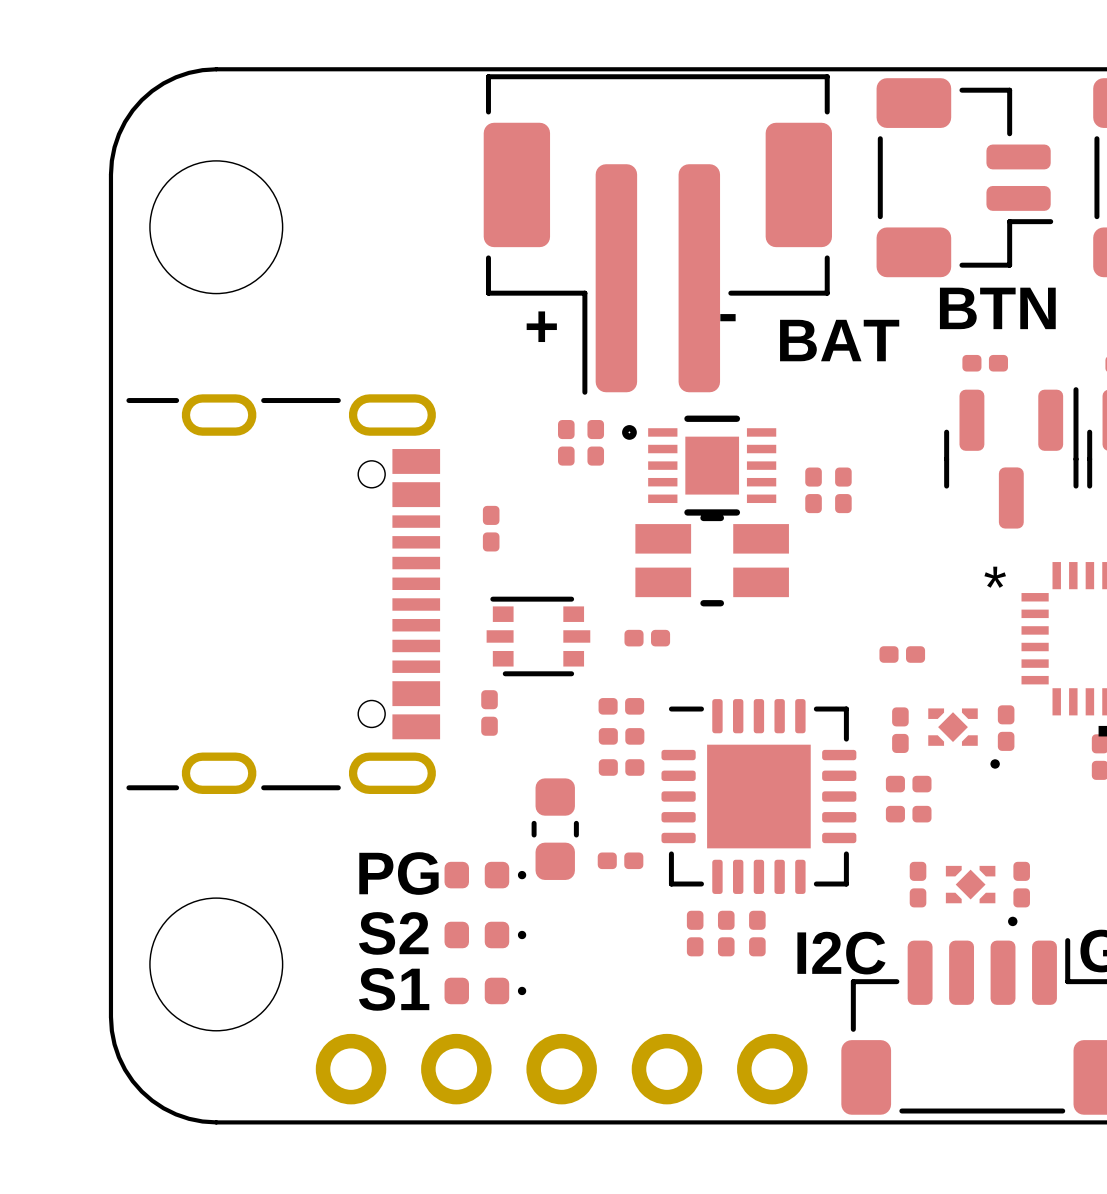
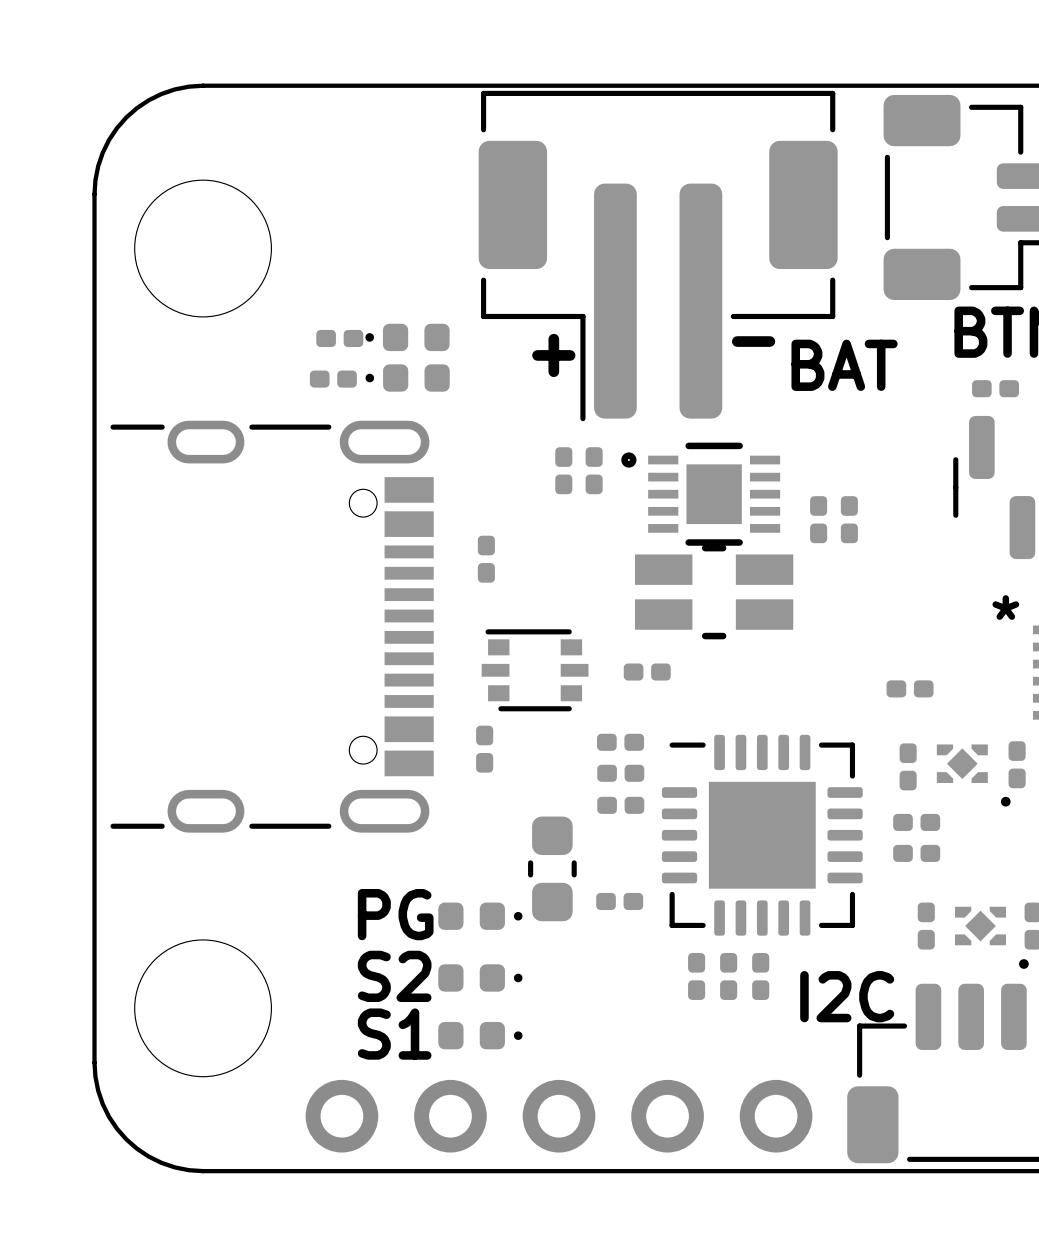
part: none -> (407, 337)
part: none -> (339, 338)
part: none -> (407, 378)
part: none -> (333, 379)

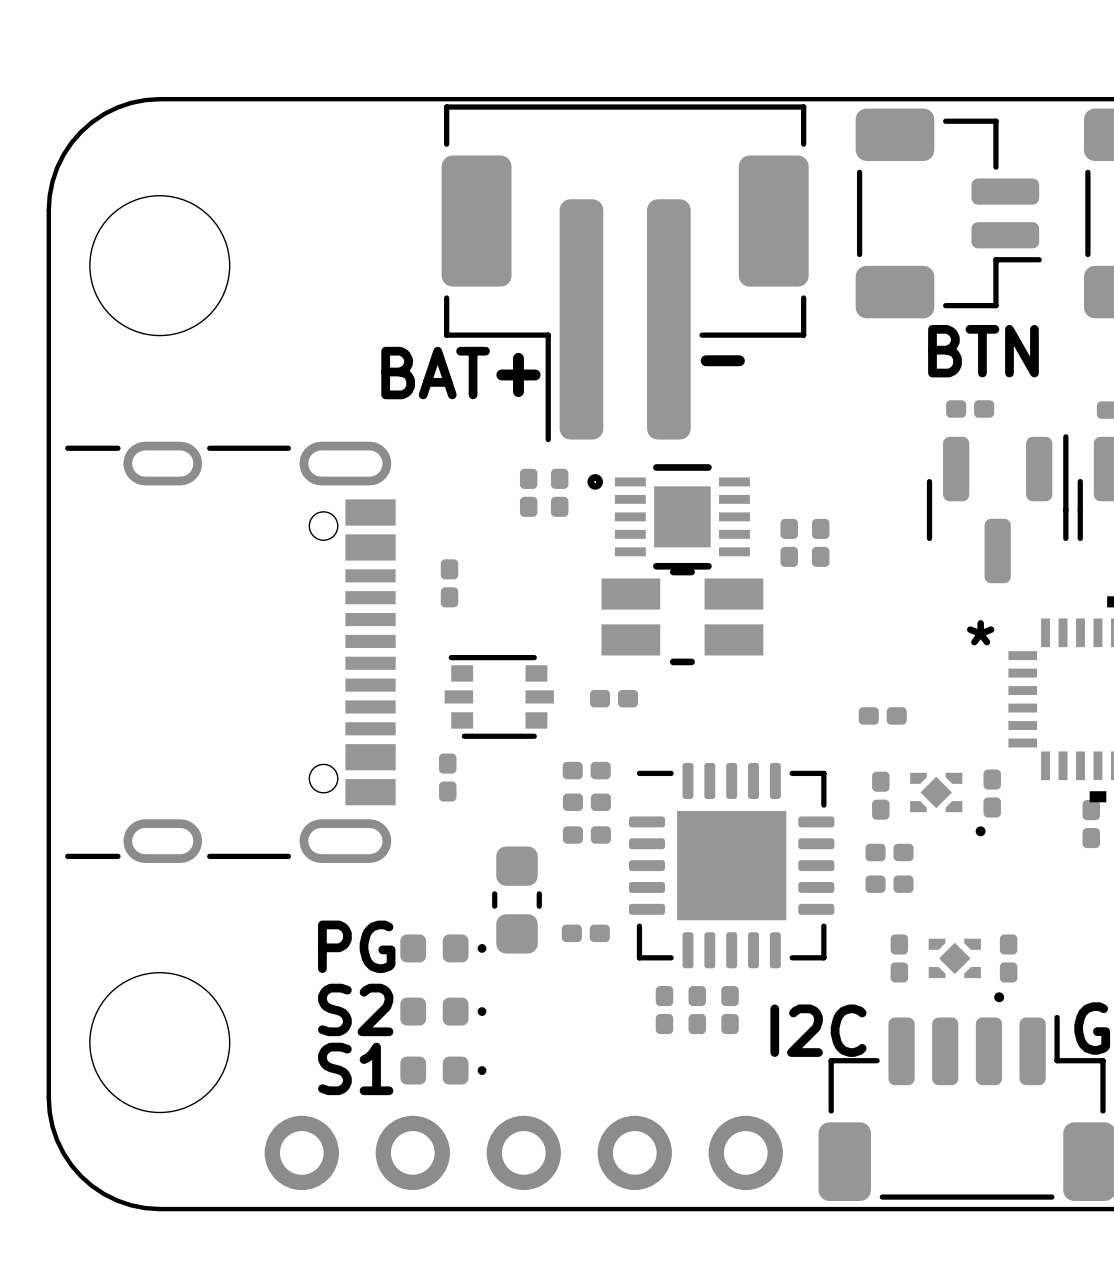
part: (407, 337) -> none
part: (339, 338) -> none
text position: BAT (844, 365) -> BAT (435, 373)
part: (407, 378) -> none
part: (333, 379) -> none

